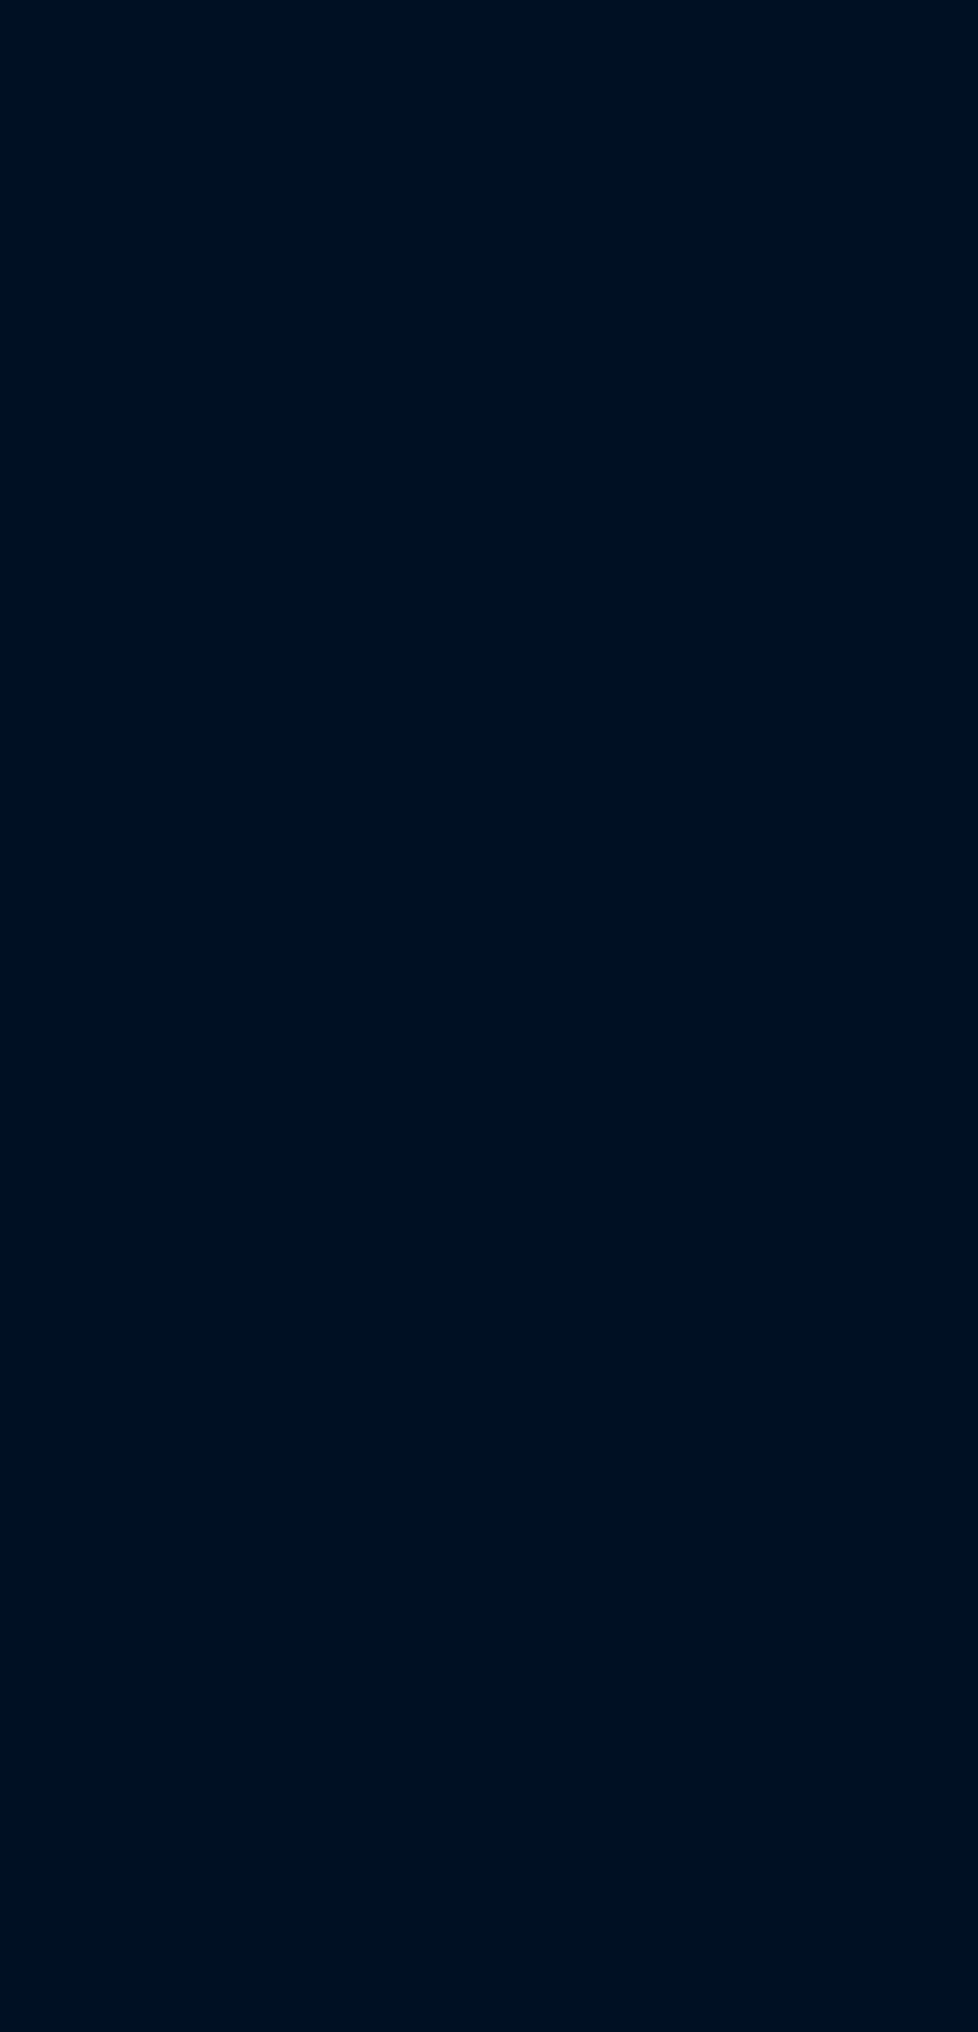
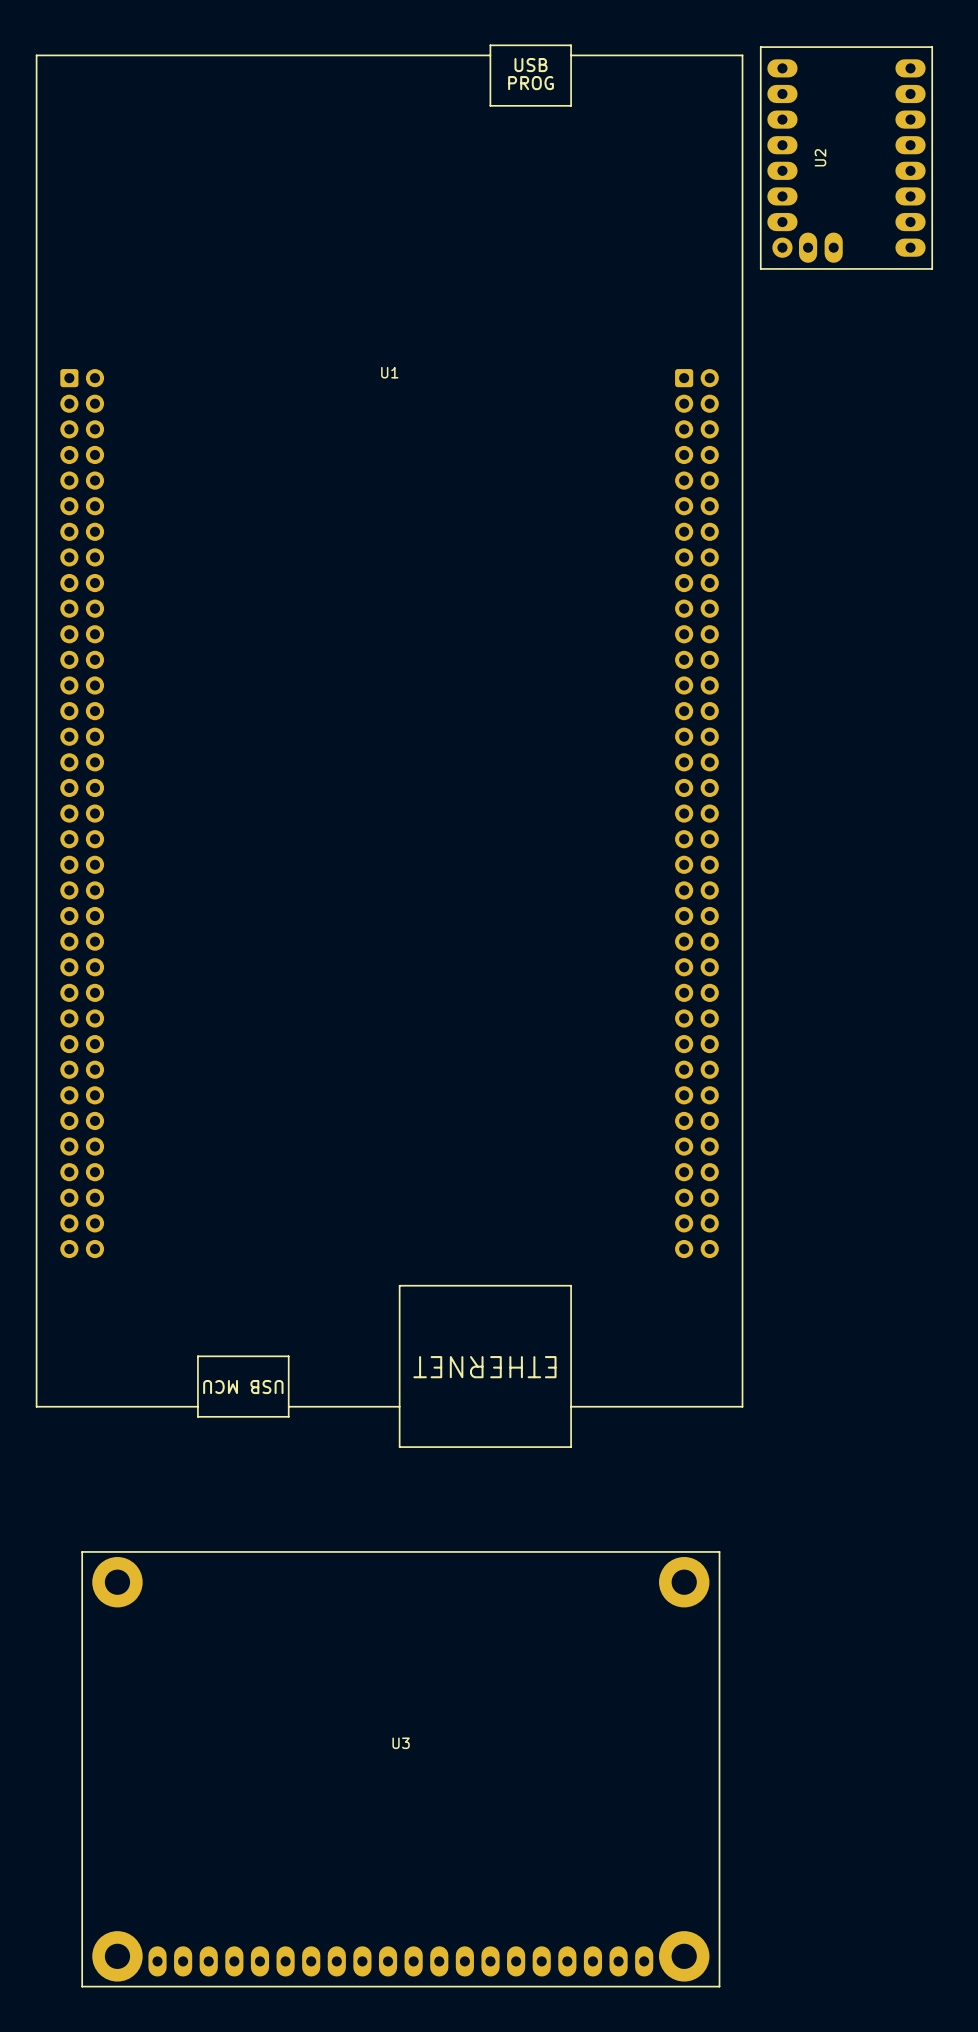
U2: none -> (846, 158)
U1: none -> (389, 746)
U3: none -> (400, 1769)

